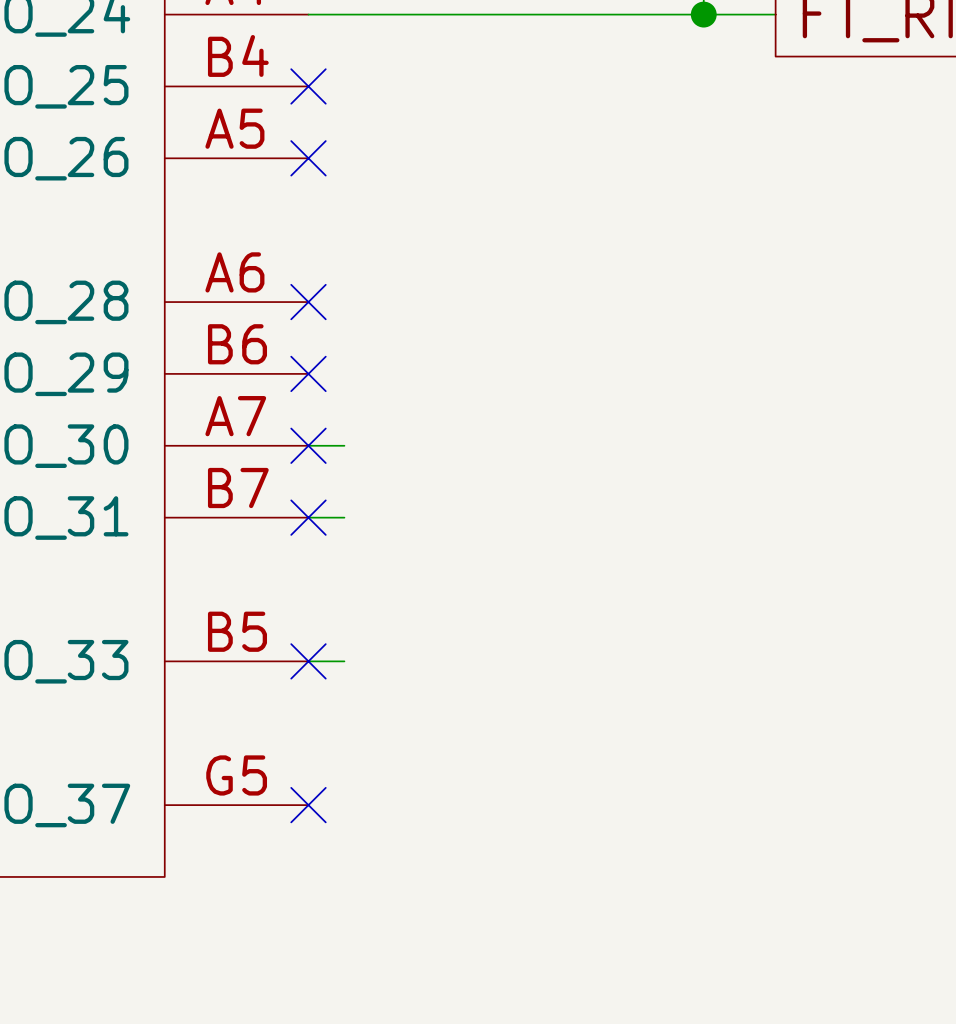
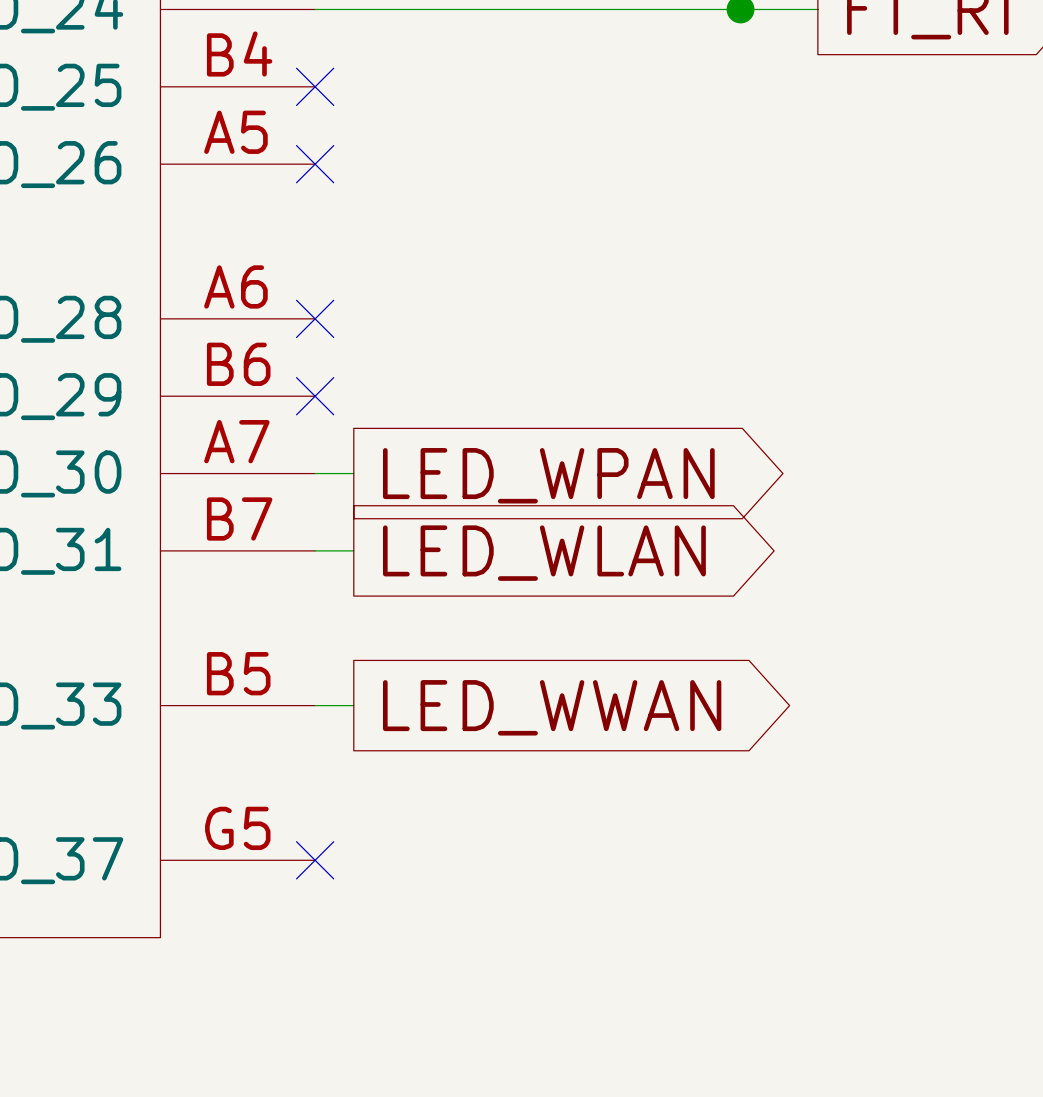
no-connect mark: (308, 445) -> none
global label: none -> LED_WPAN (548, 475)
no-connect mark: (308, 517) -> none
global label: none -> LED_WLAN (544, 553)
no-connect mark: (308, 661) -> none
global label: none -> LED_WWAN (552, 707)

